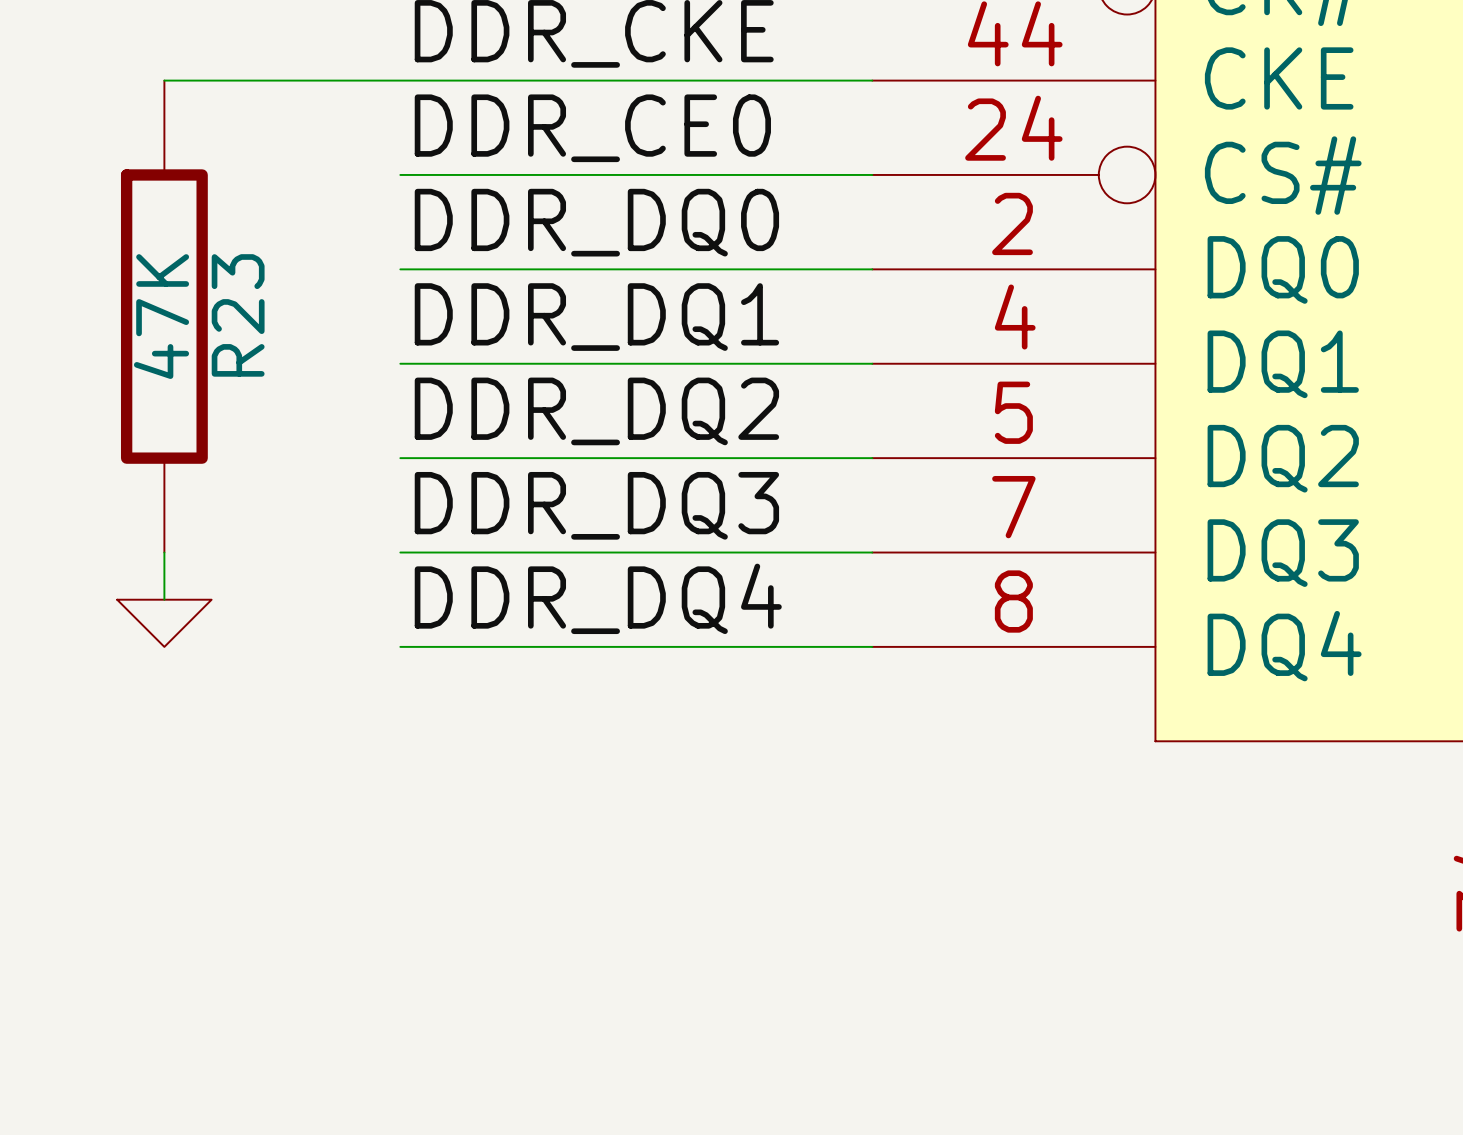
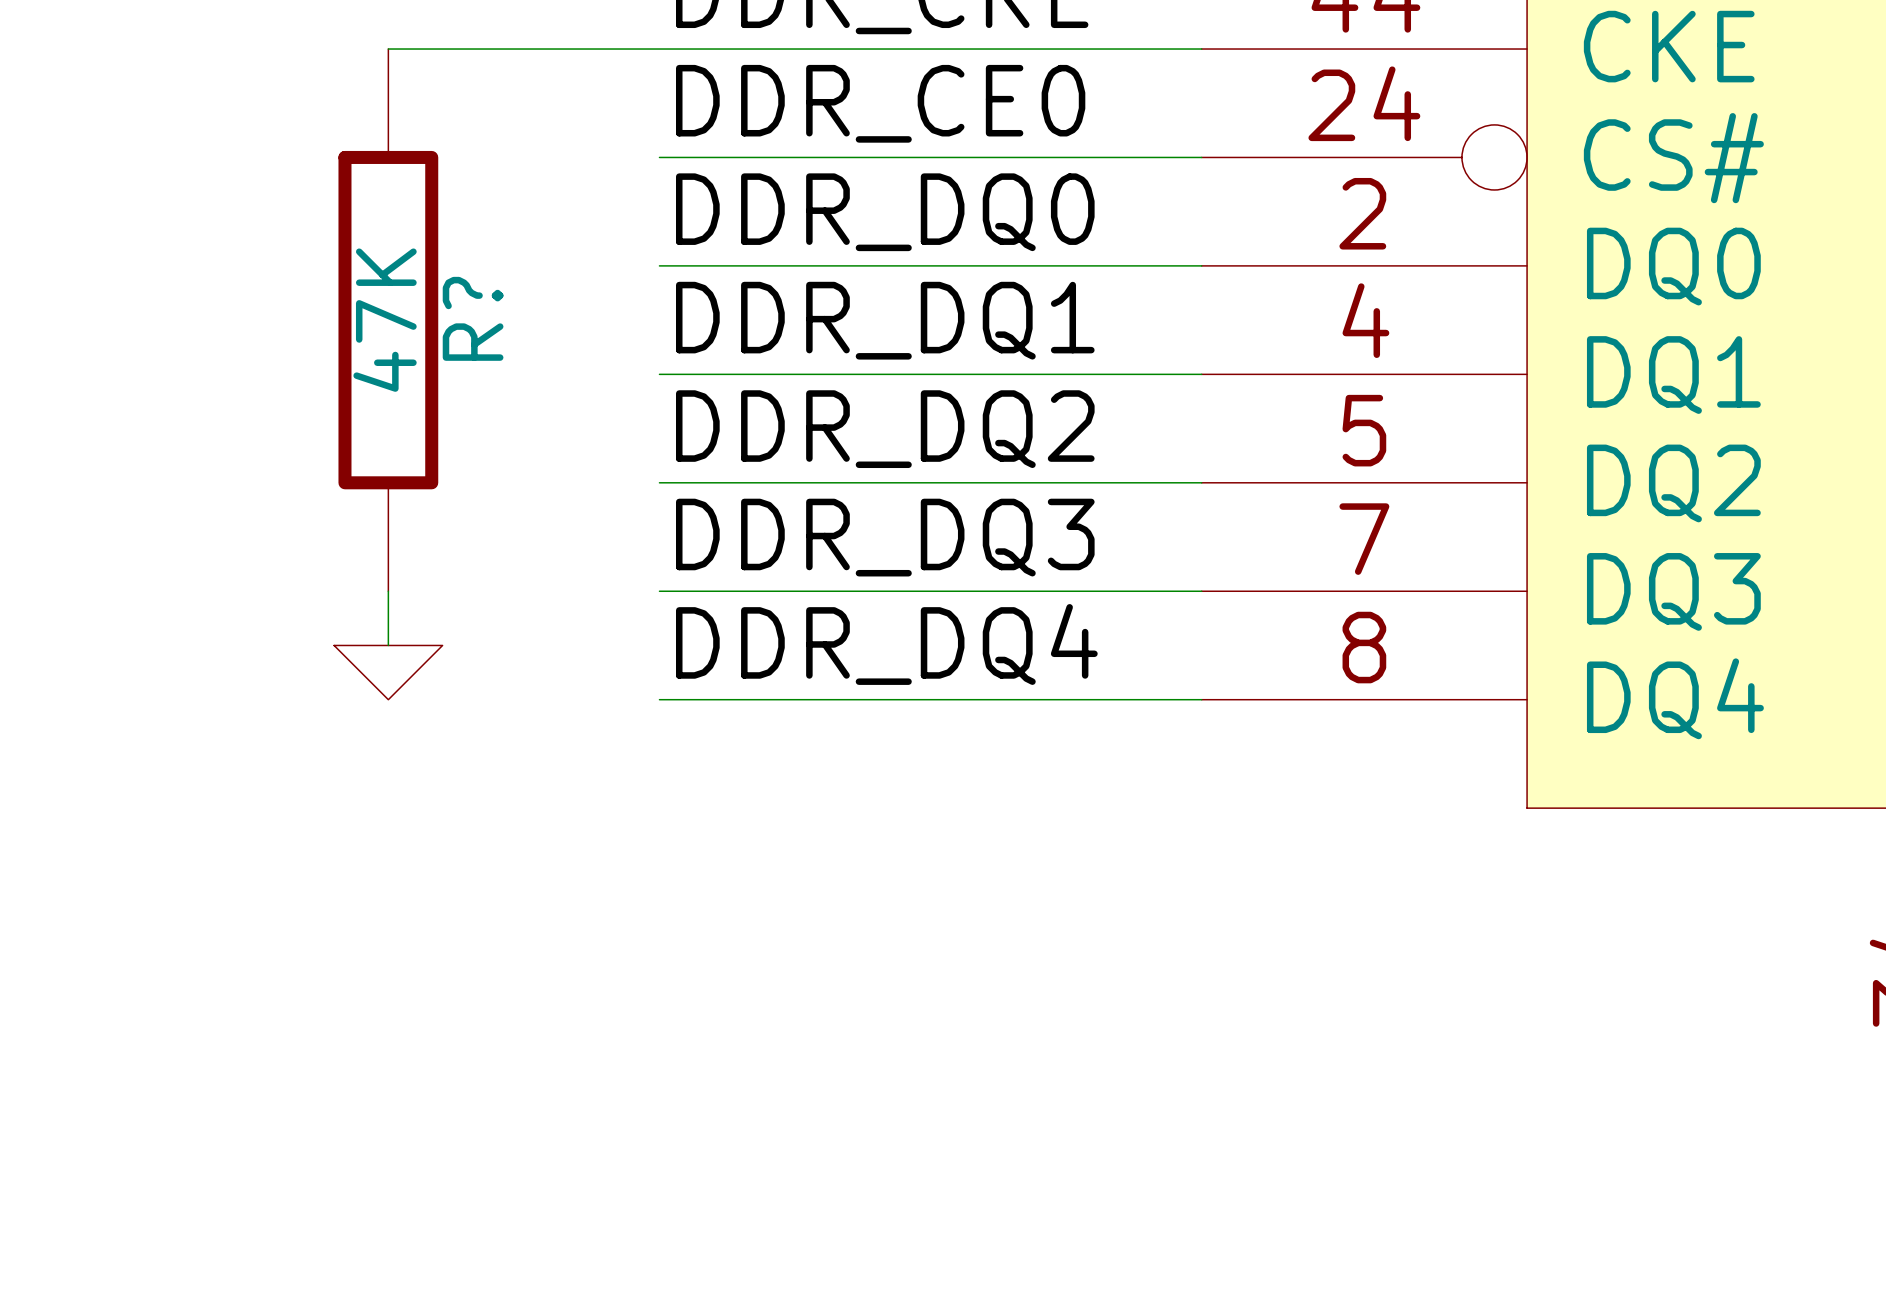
R23 name: R23 (238, 315) -> R? (473, 318)

